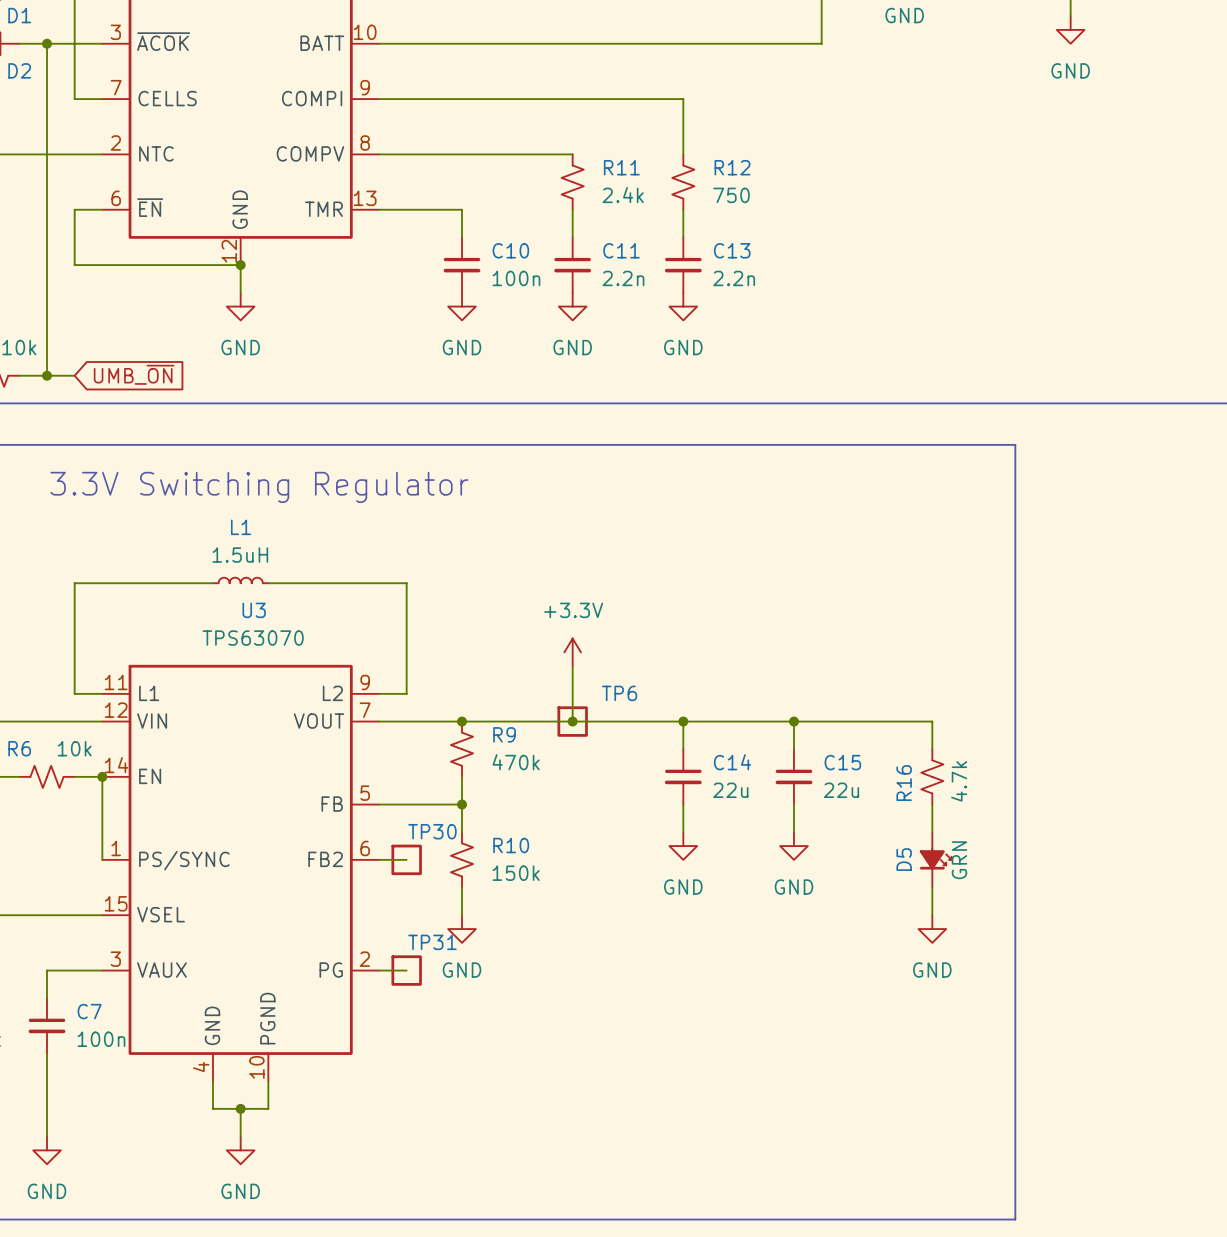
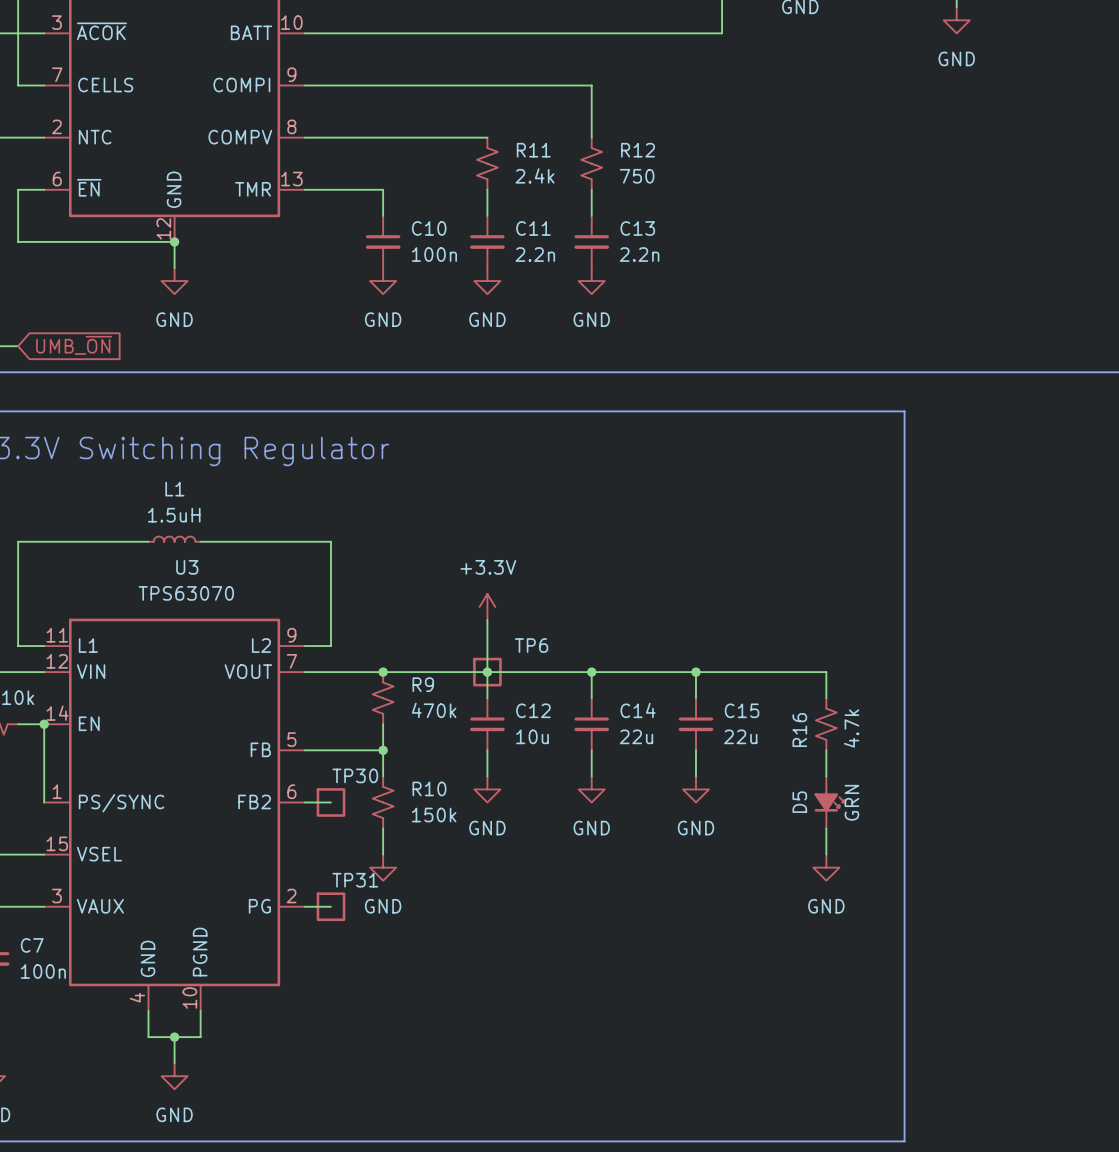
wire: none -> (487, 672) (487, 698)
C12: none -> 10u (487, 724)
wire: none -> (487, 750) (487, 776)
power symbol: none -> GND (487, 789)

